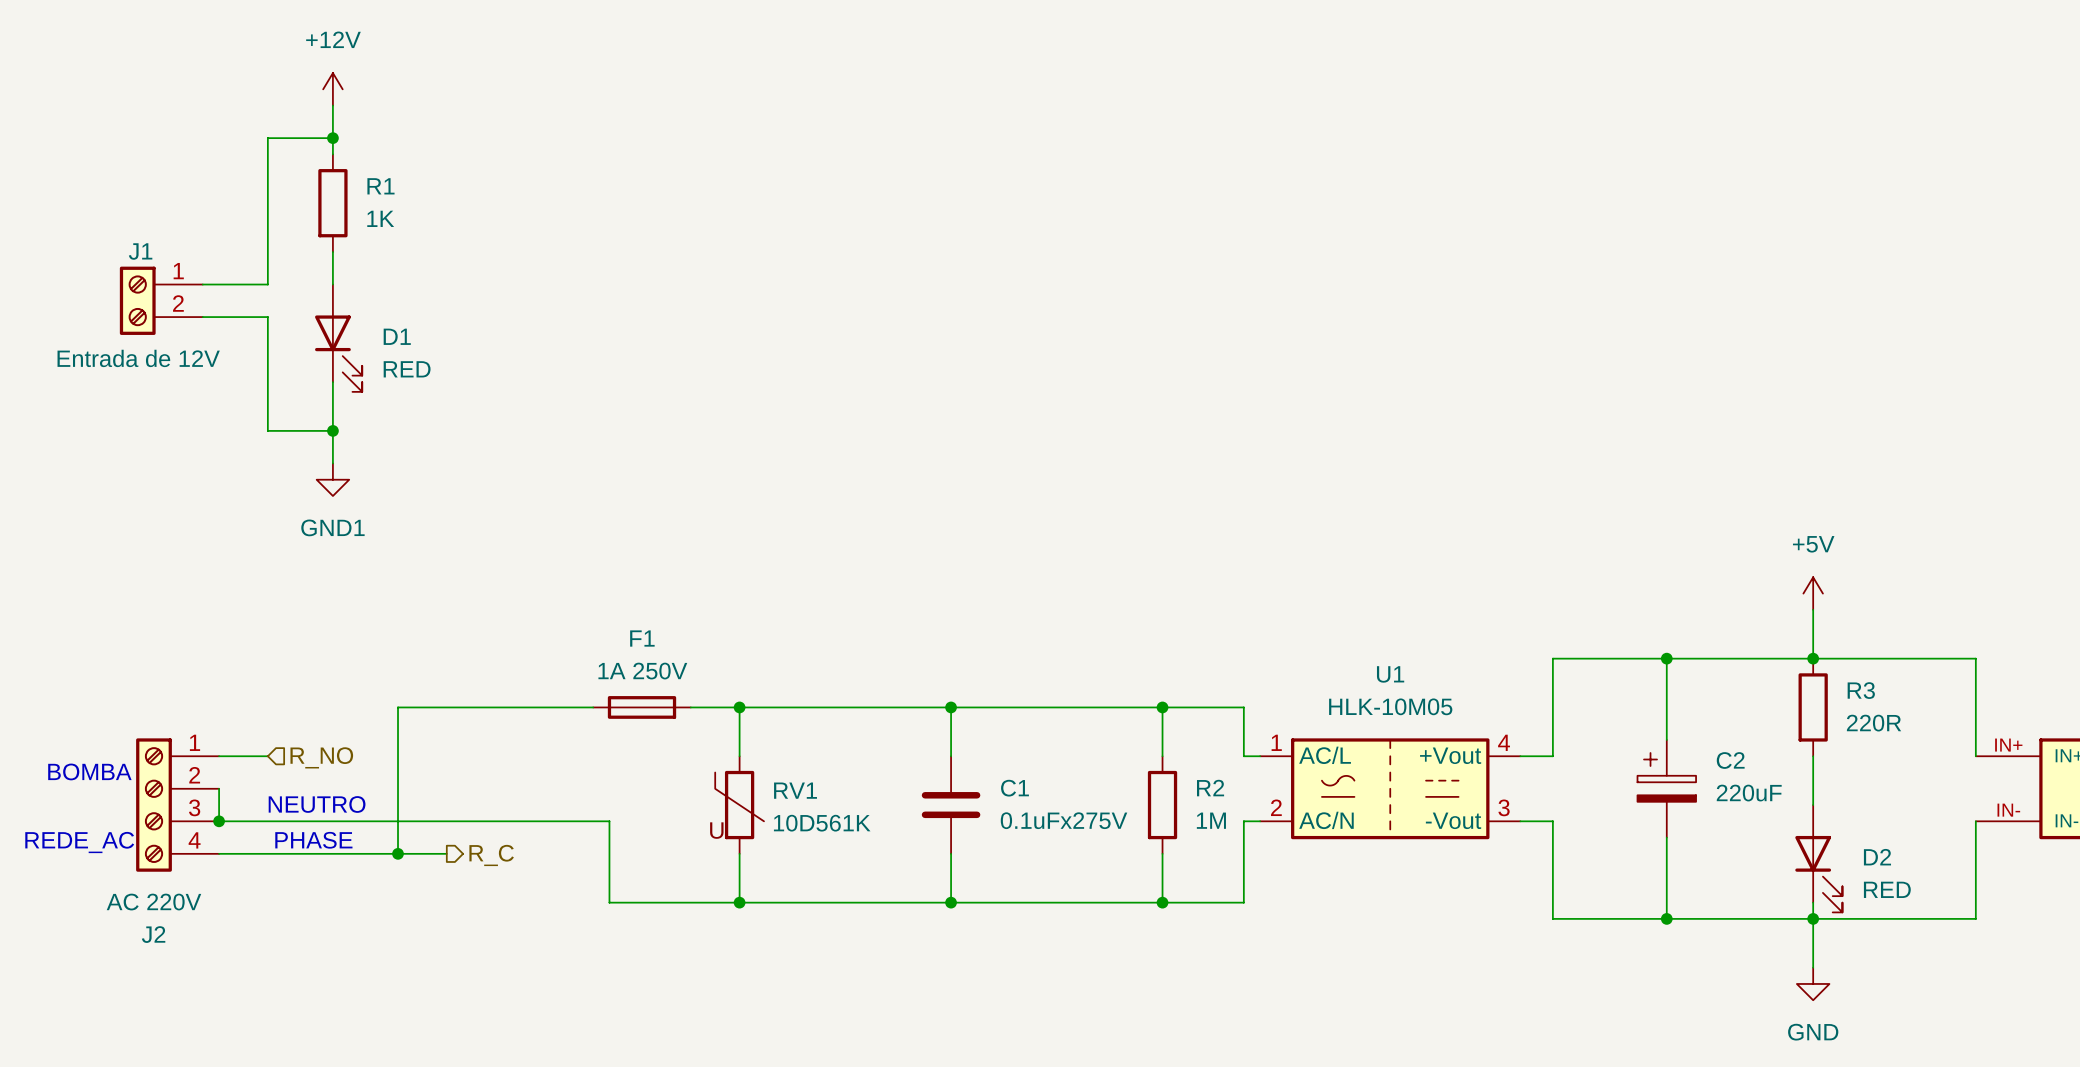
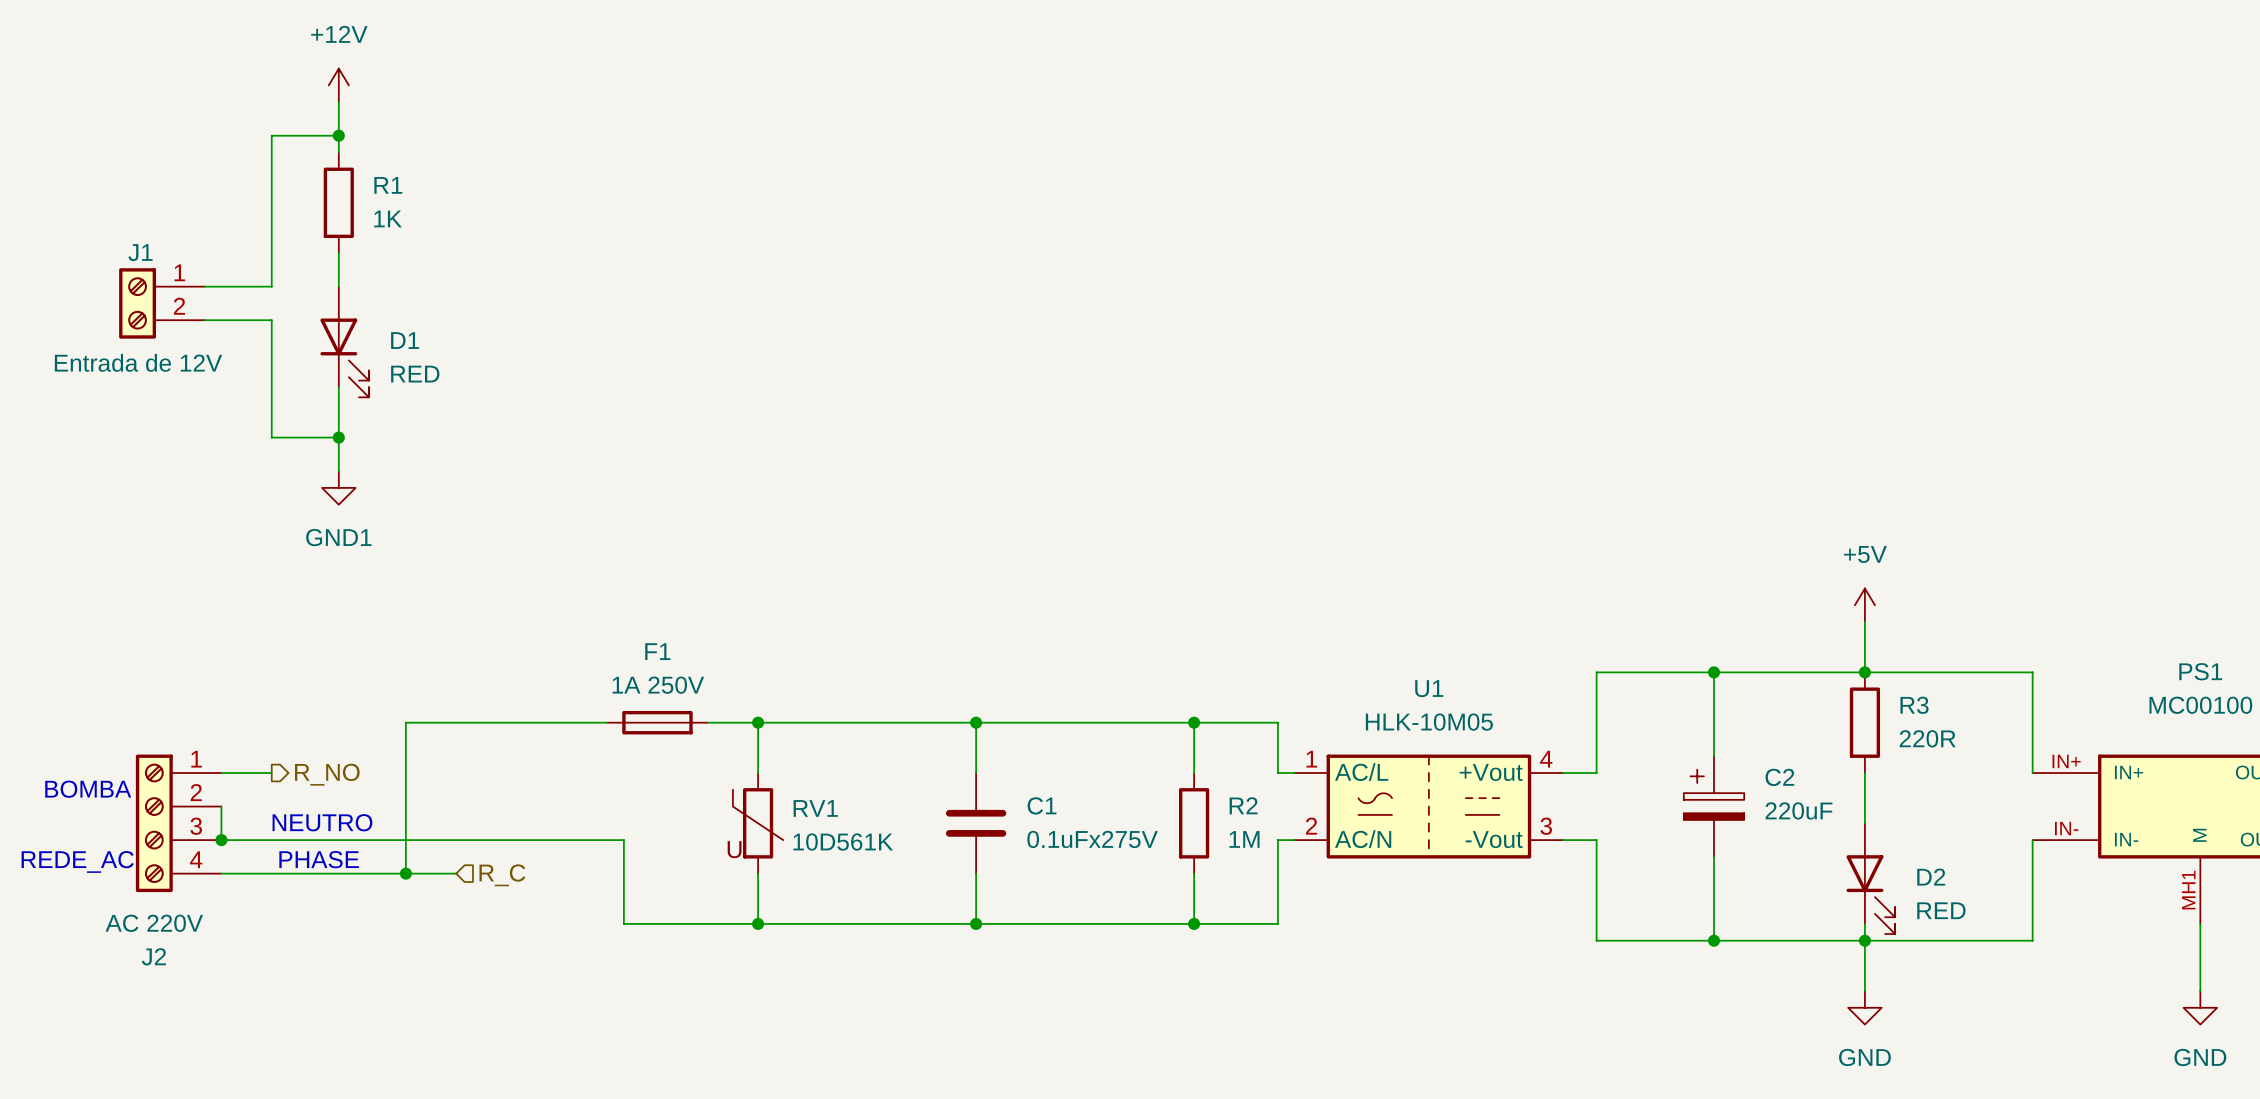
hierarchical label shape: input (321, 757) -> output (327, 774)
hierarchical label shape: output (491, 855) -> input (502, 875)

